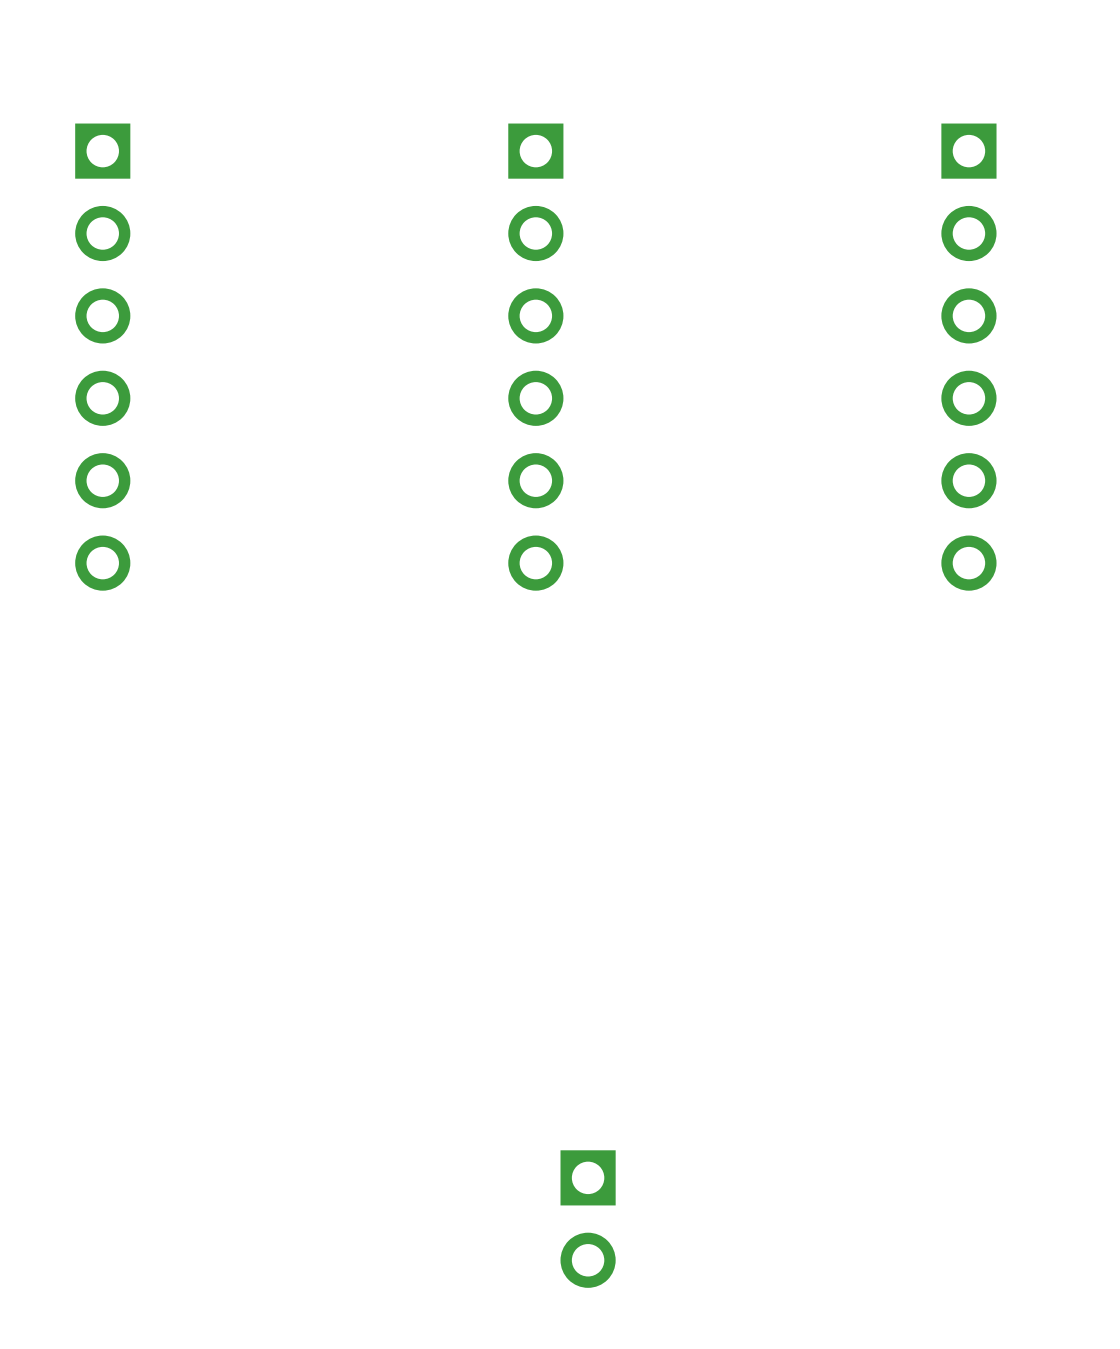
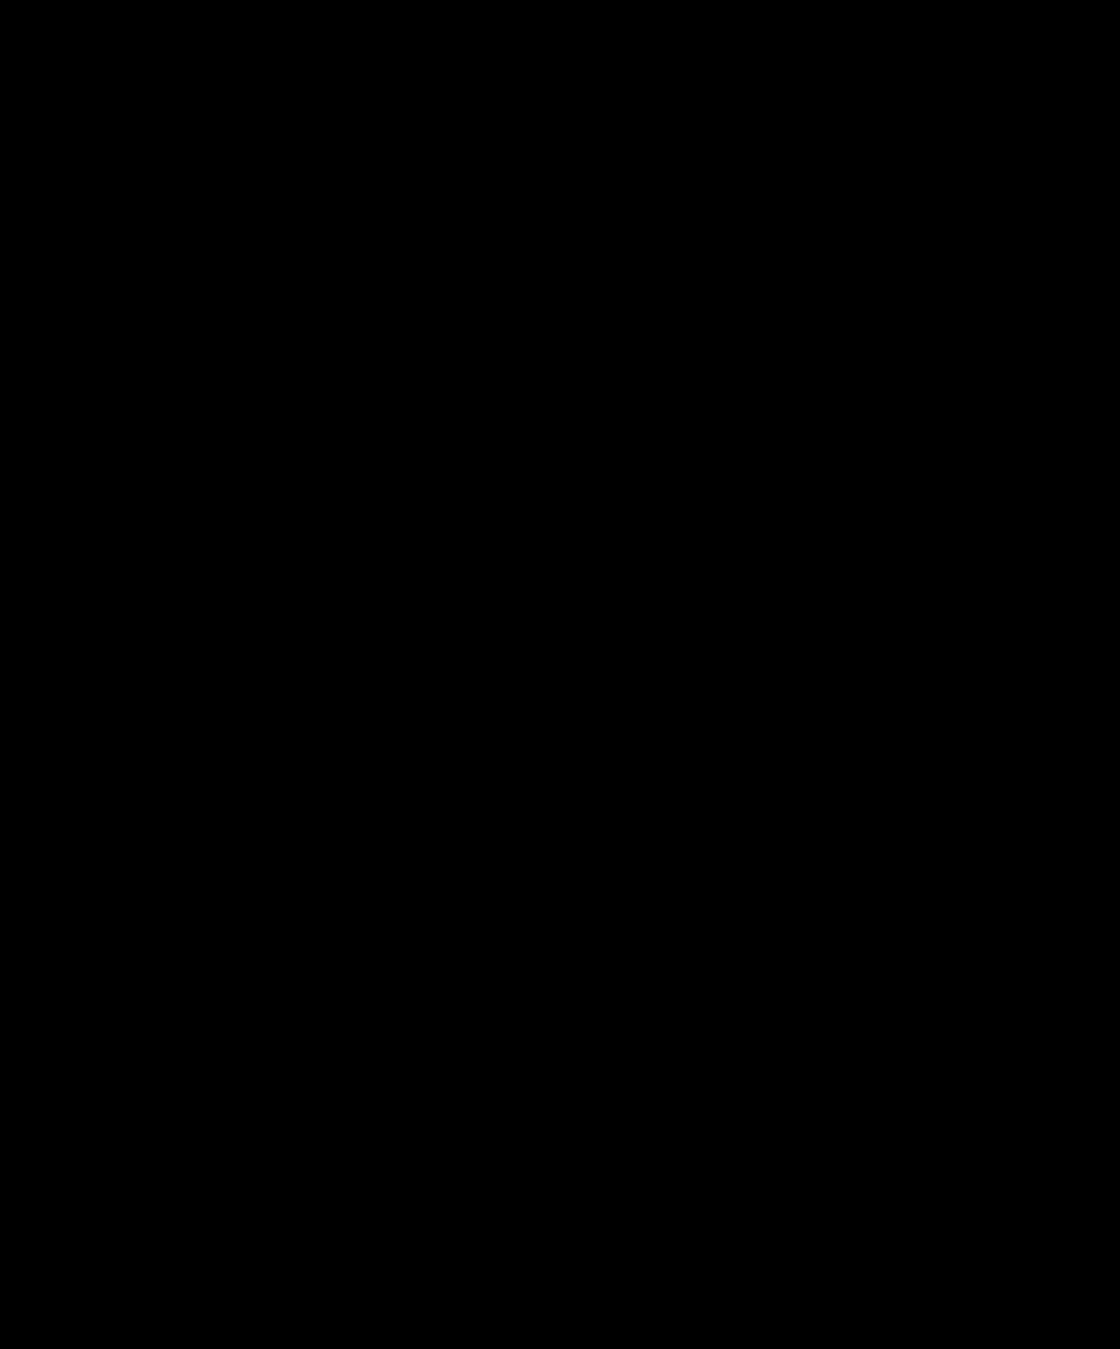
part: (102, 357) -> none
part: (535, 357) -> none
part: (968, 357) -> none
part: (588, 1219) -> none

